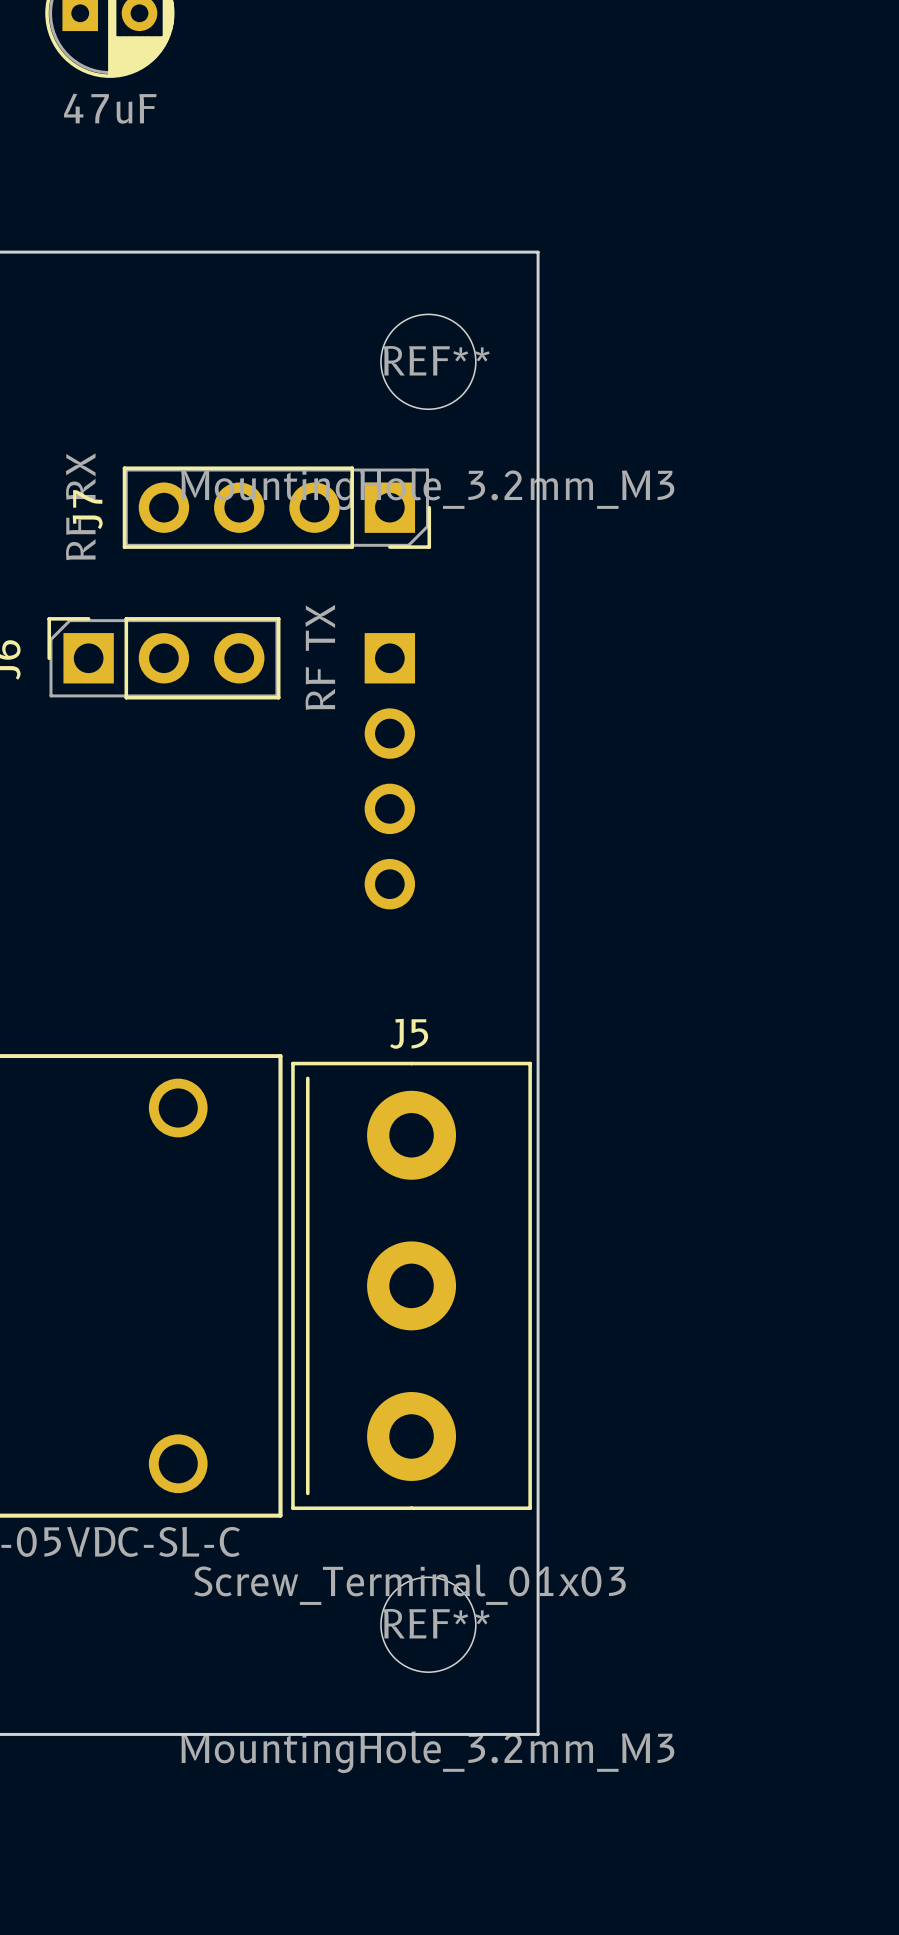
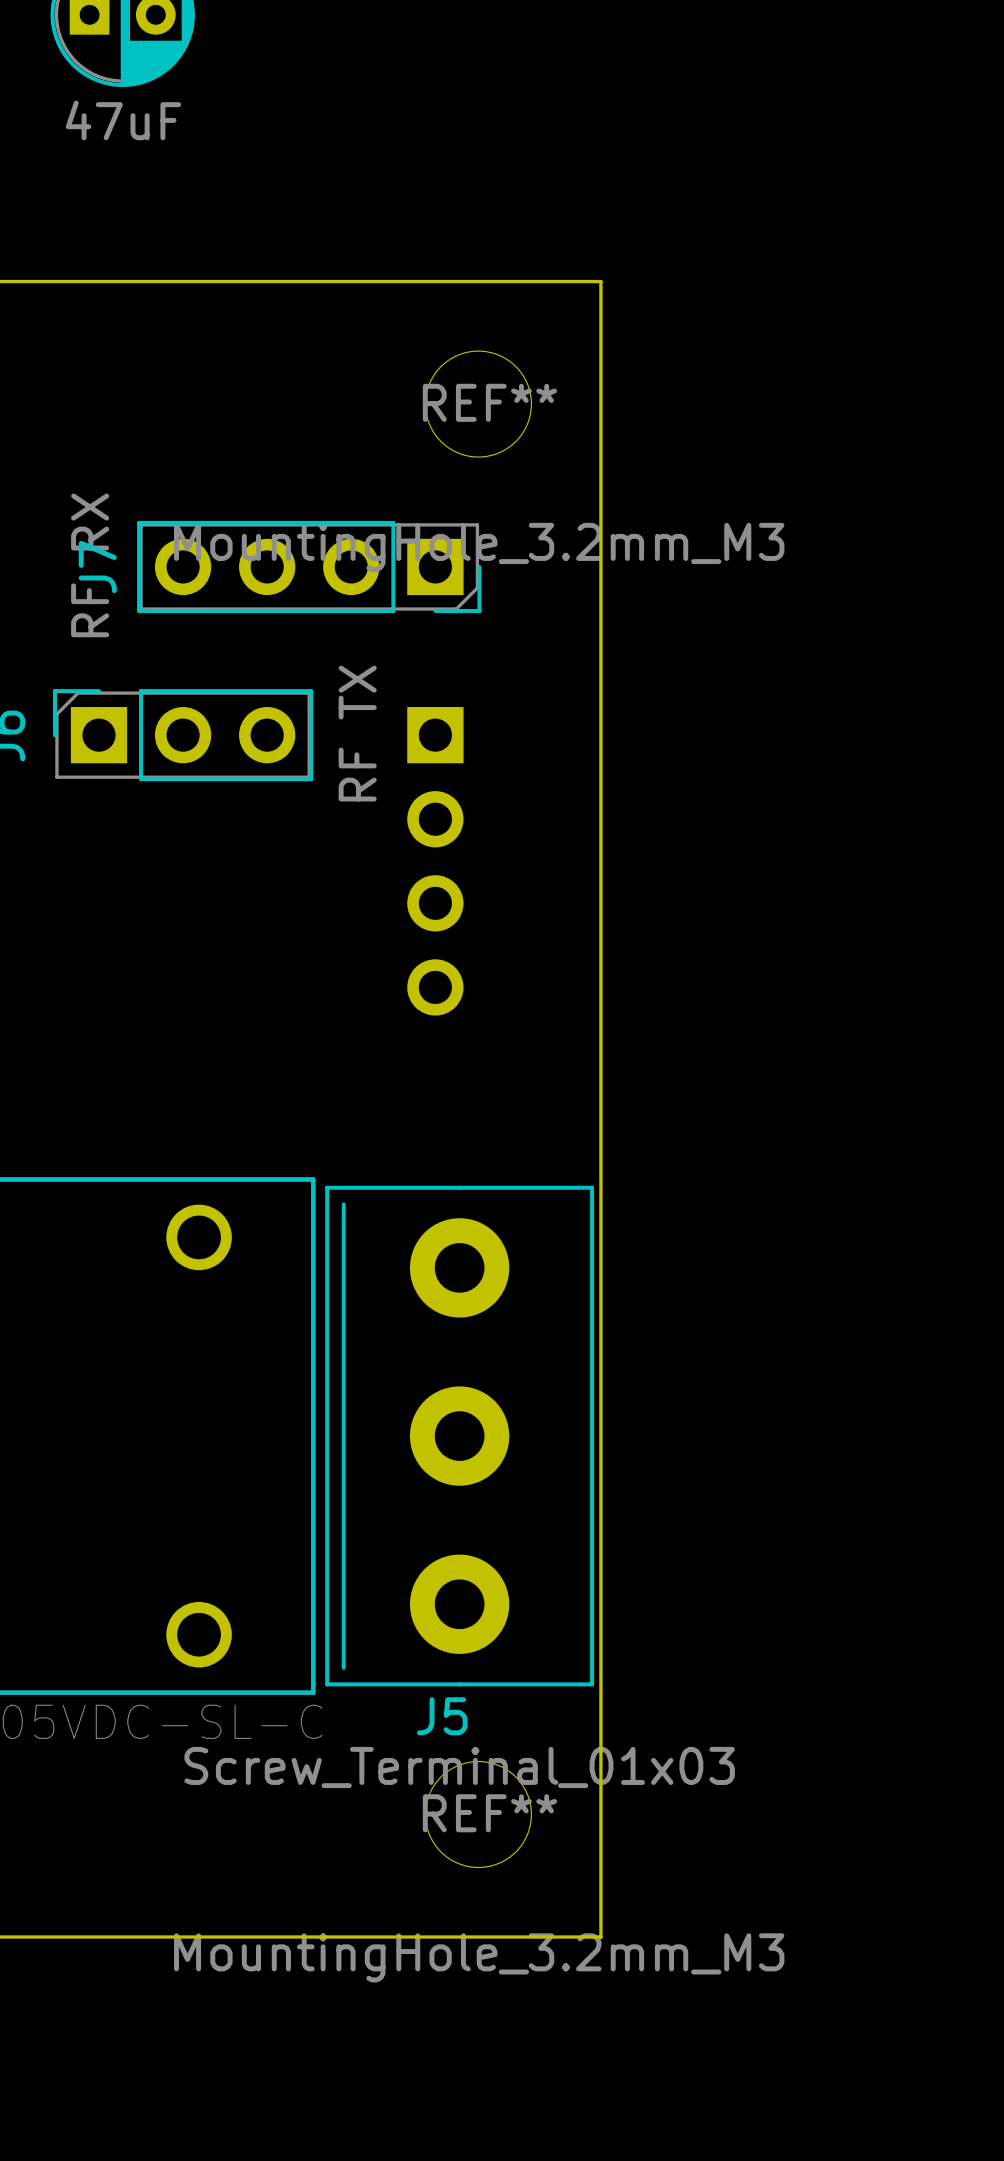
J5 name position: J5 (409, 1033) -> J5 (442, 1716)

